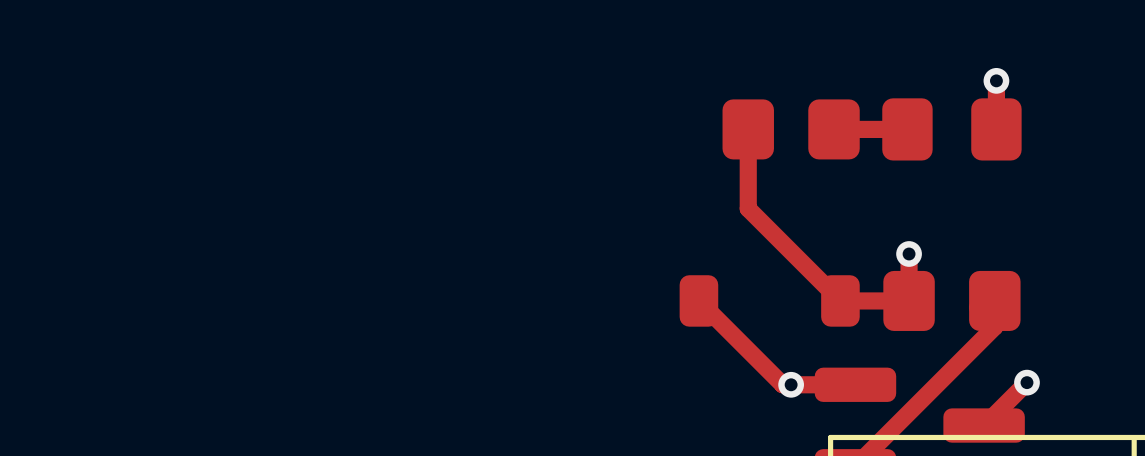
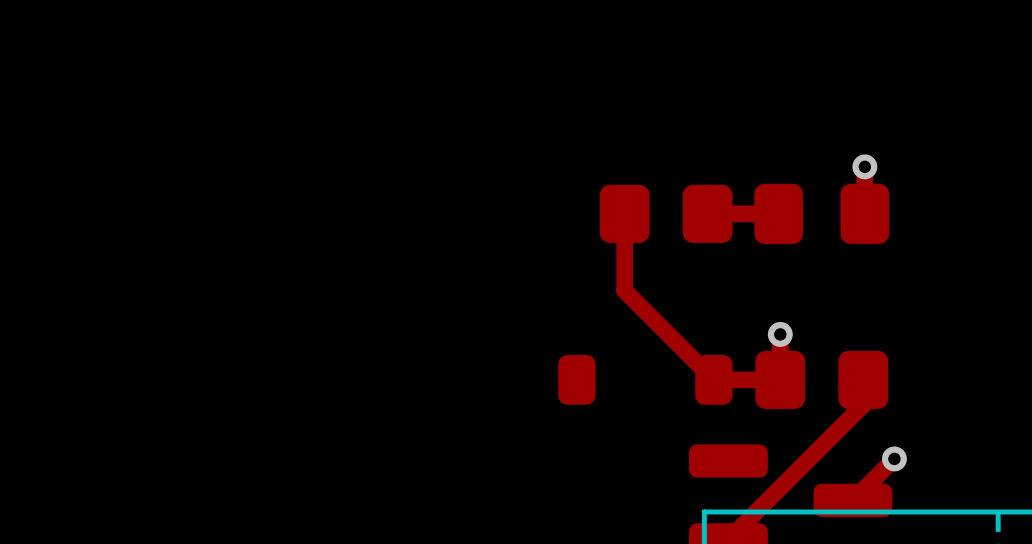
top track: (698, 300) (782, 384) (855, 384) -> none
via: (791, 384) -> none

